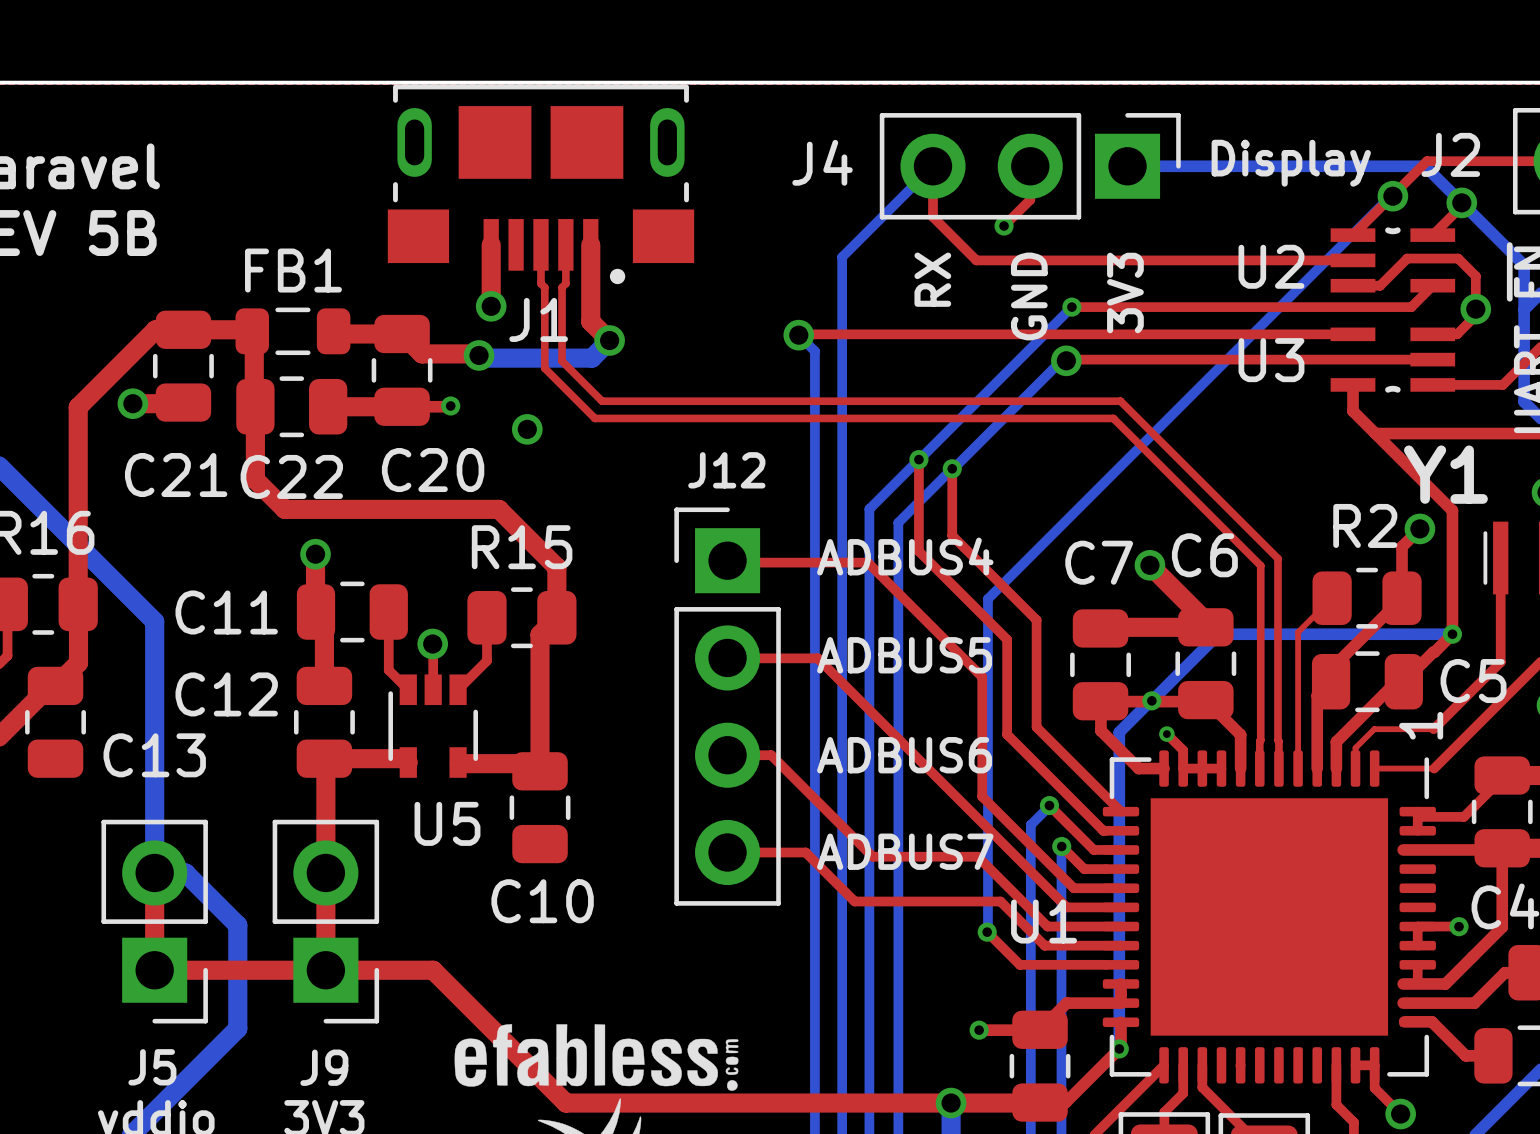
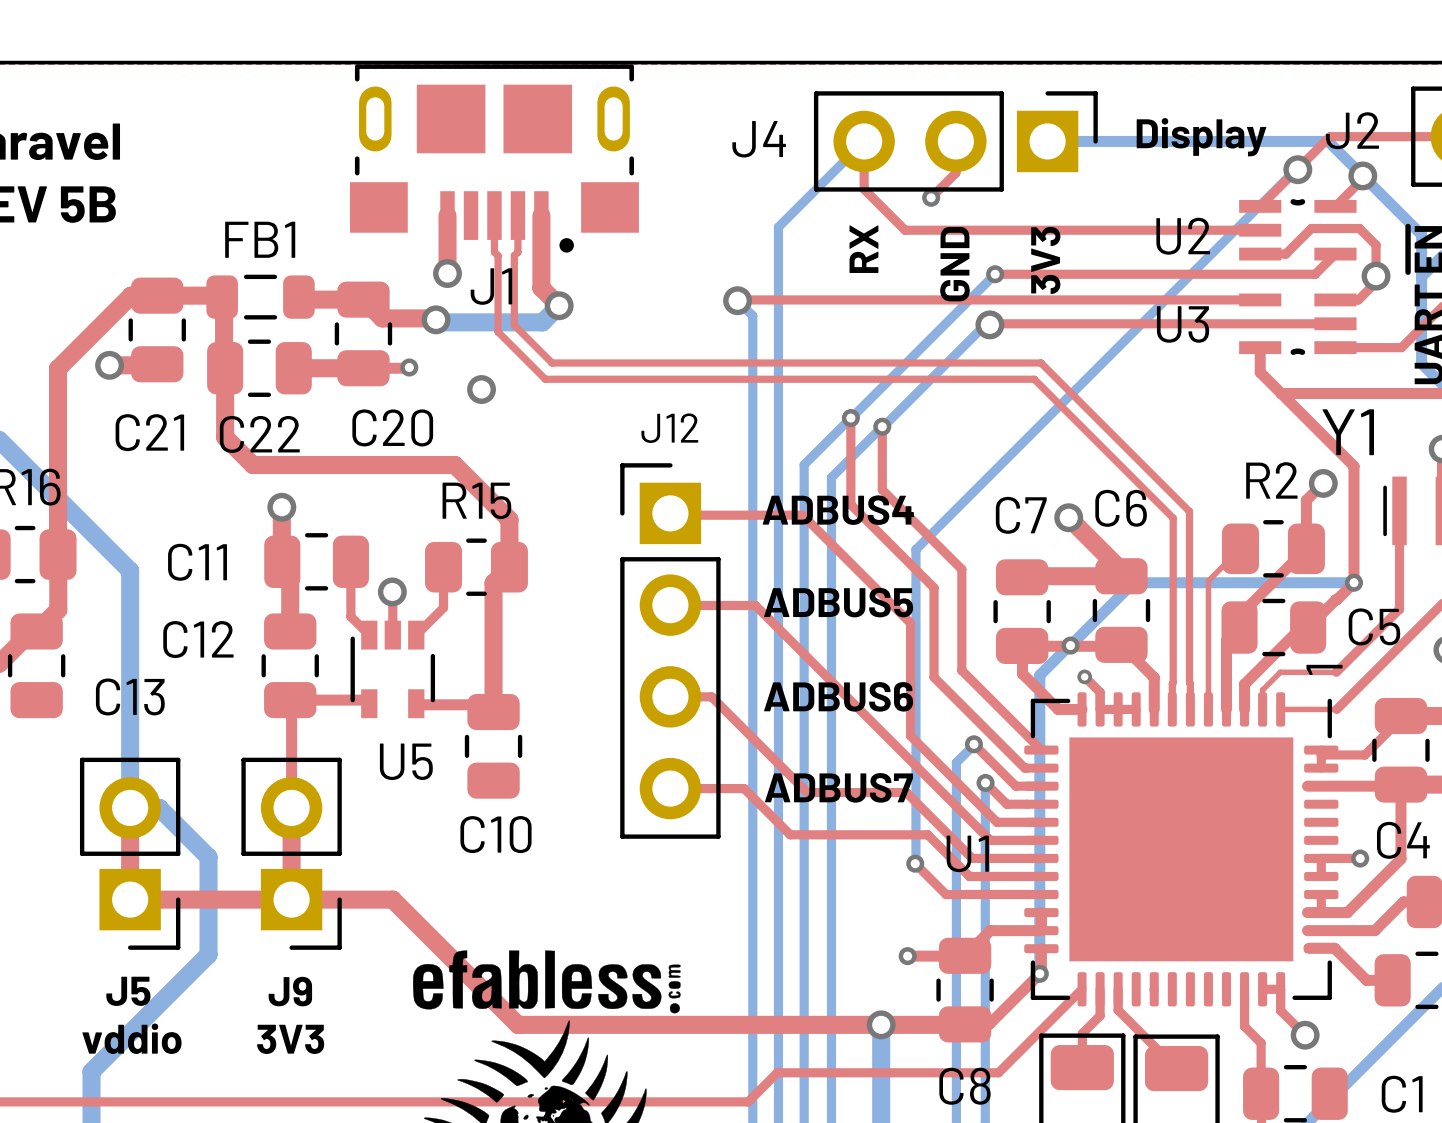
top track width: thick (324, 758) (404, 758) (408, 762) -> thin (290, 700) (365, 700) (369, 703)
top track width: thick (325, 760) (325, 872) -> thin (291, 701) (291, 807)
top track width: thick (459, 763) (532, 763) -> thin (417, 704) (486, 704)

